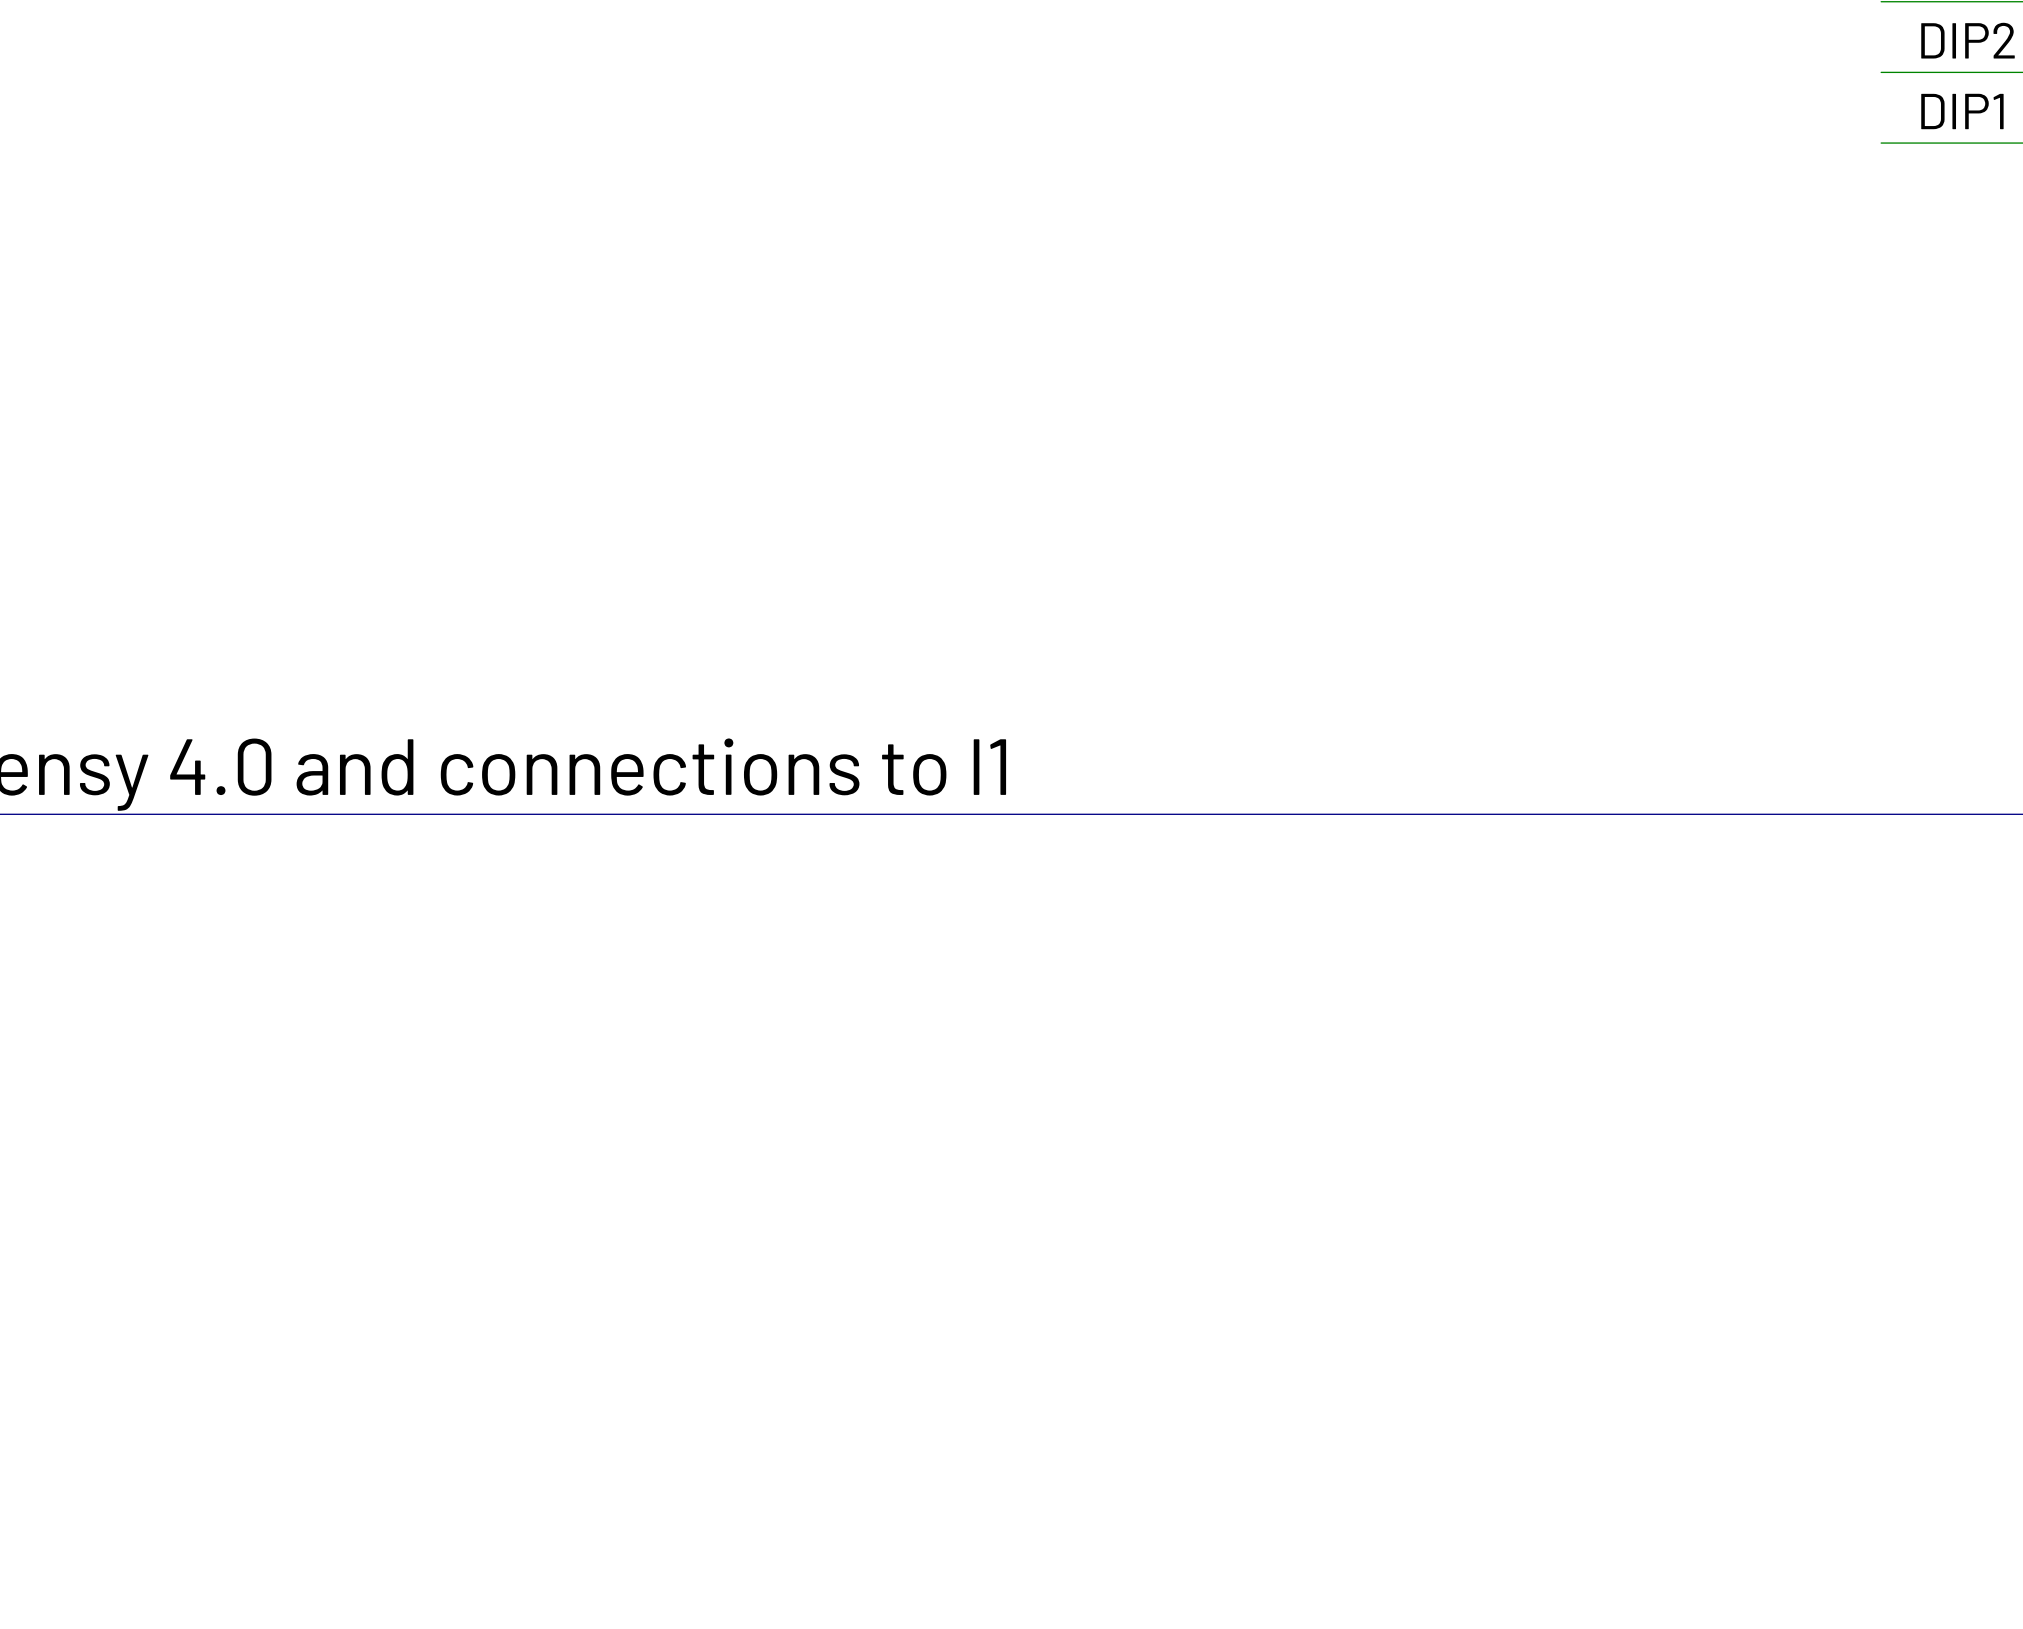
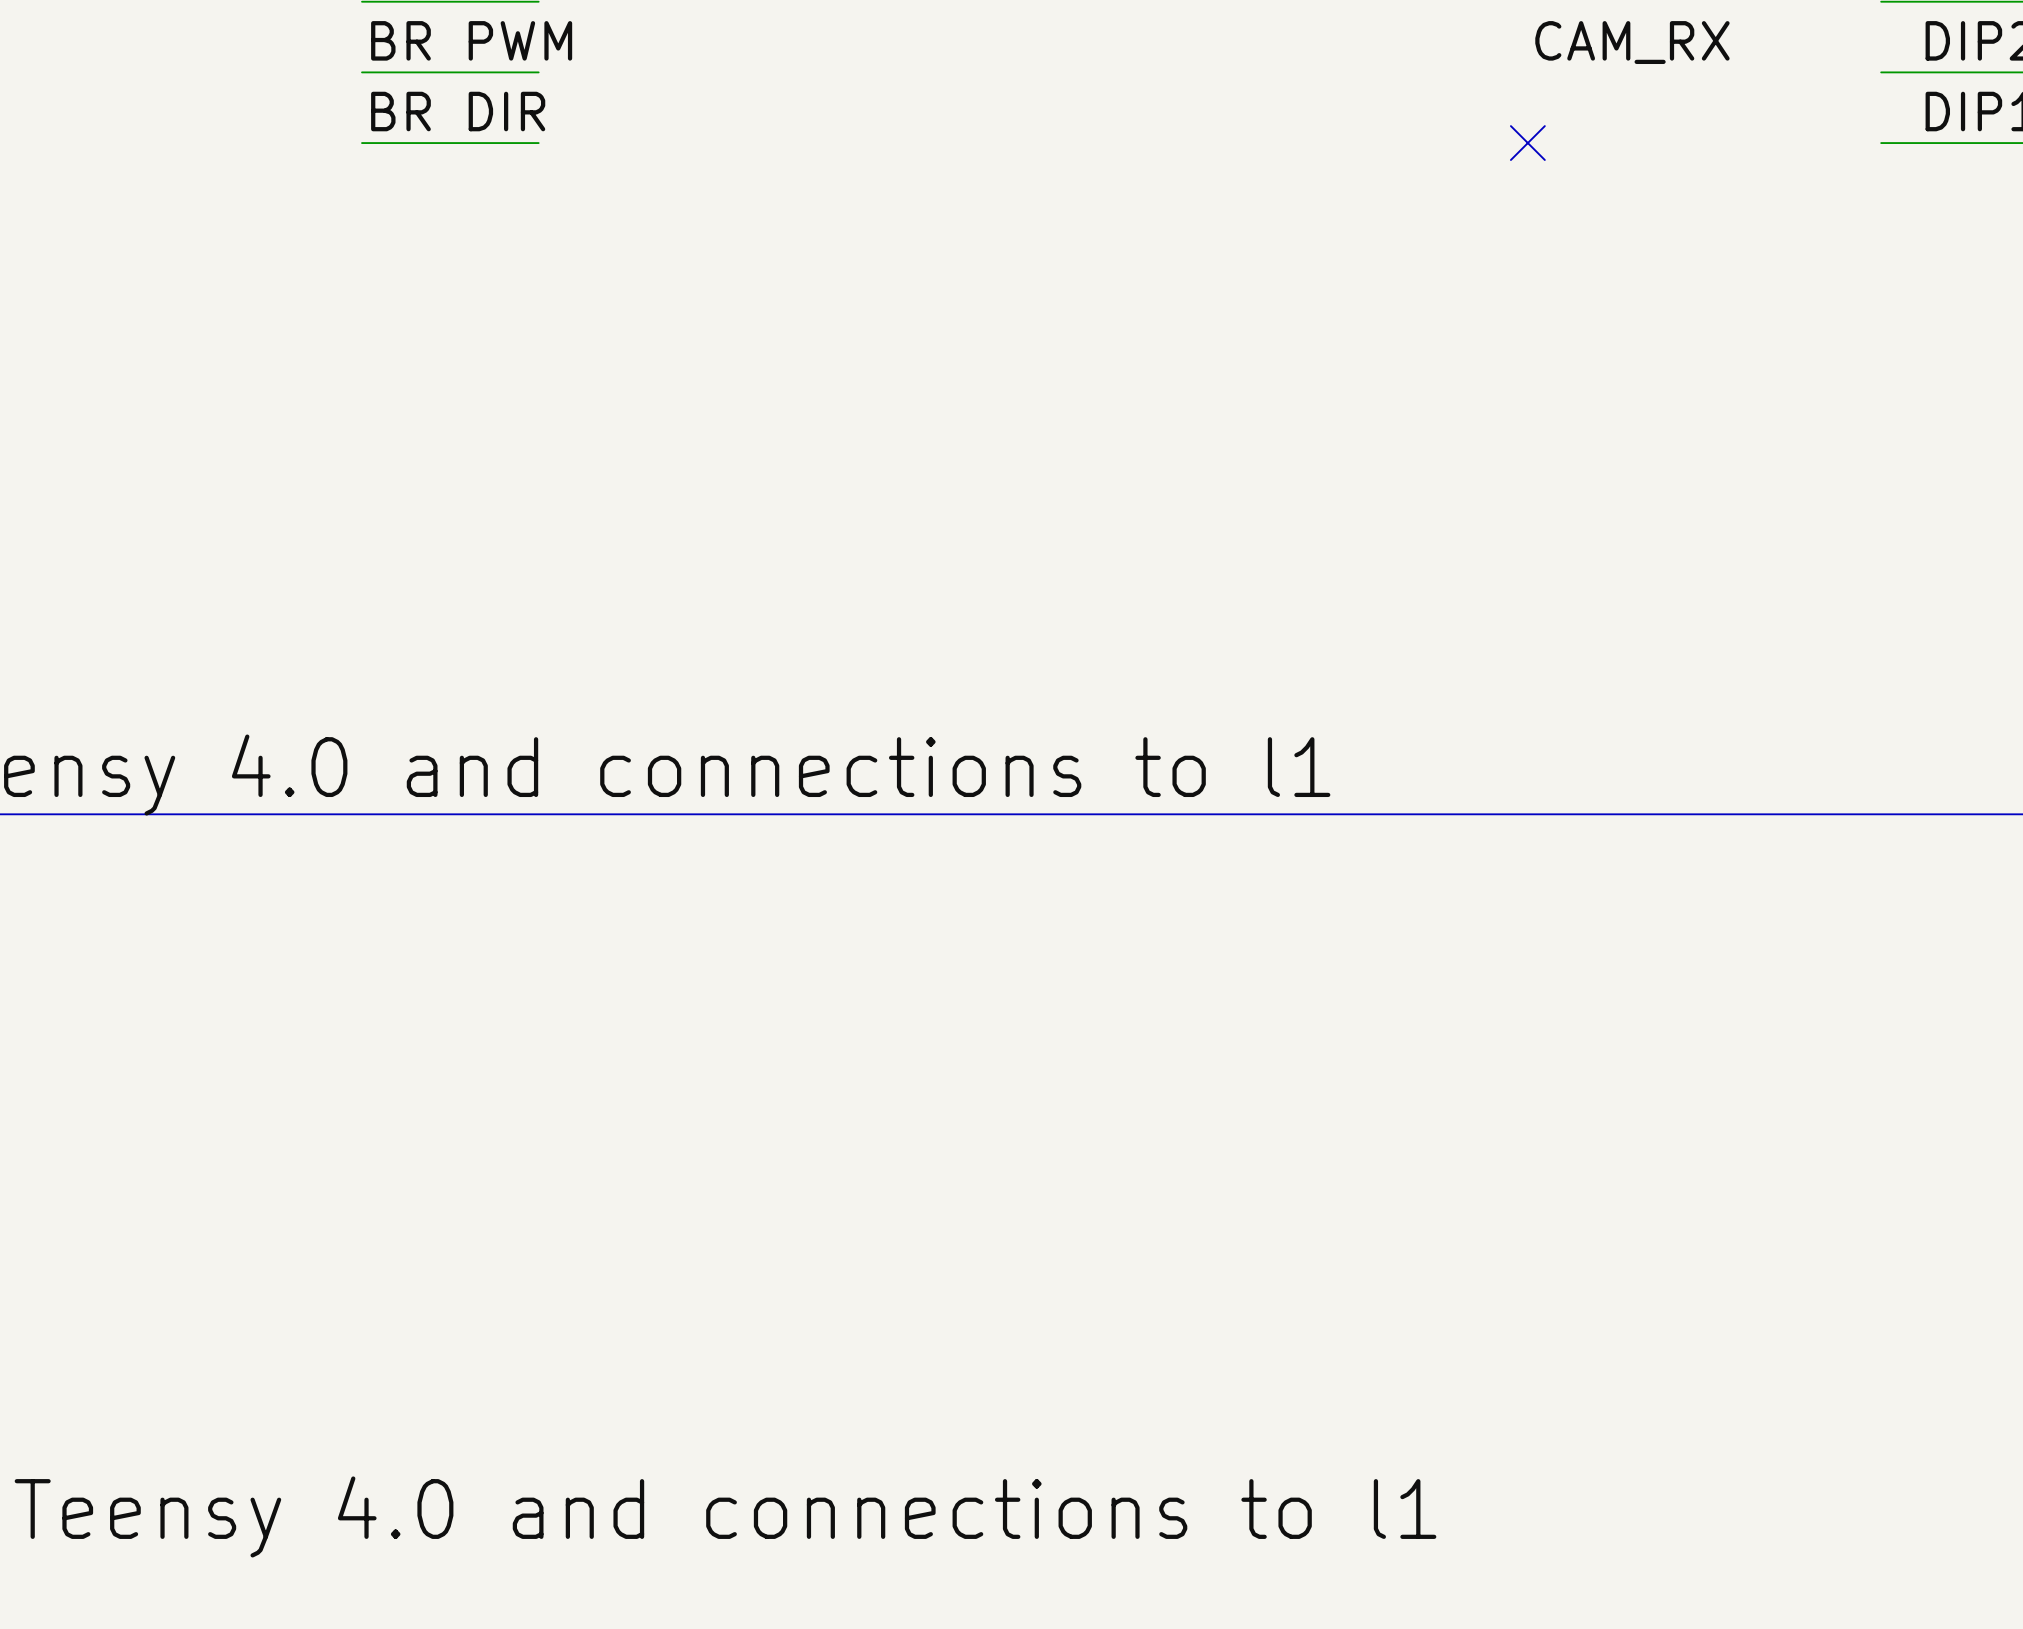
wire: none -> (362, 1) (538, 1)
label: none -> BR PWM (471, 40)
label: none -> CAM_RX (1632, 42)
wire: none -> (362, 72) (538, 72)
label: none -> BR DIR (458, 111)
wire: none -> (362, 143) (538, 143)
no-connect mark: none -> (1527, 143)
label: none -> Teensy 4.0 and connections to l1 (725, 1516)

